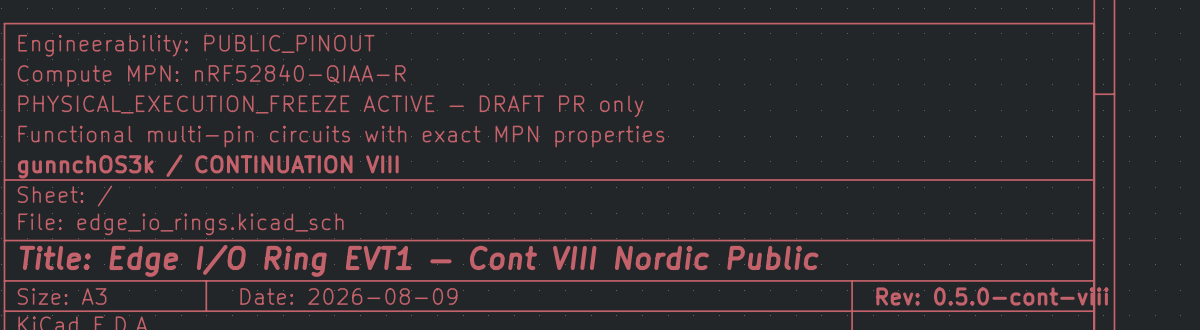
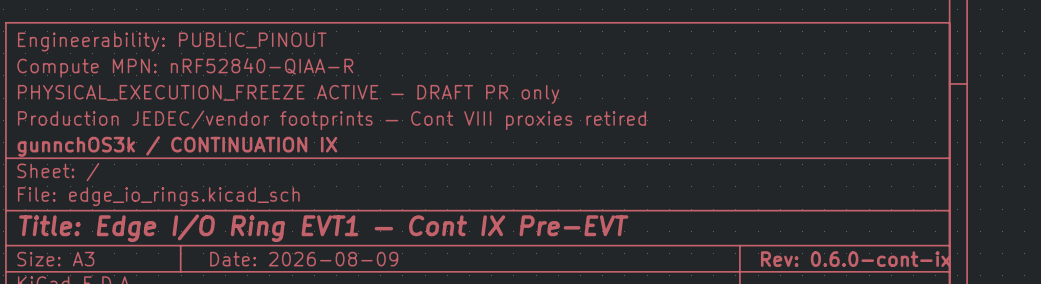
title block: Functional multi-pin circuits with exact MPN properties (341, 136) -> Production JEDEC/vendor footprints — Cont VIII proxies retired (331, 120)
title block: gunnchOS3k / CONTINUATION VIII (208, 166) -> gunnchOS3k / CONTINUATION IX (177, 146)
title block: Title: Edge I/O Ring EVT1 — Cont VIII Nordic Public (419, 260) -> Title: Edge I/O Ring EVT1 — Cont IX Pre-EVT (323, 228)
title block: Rev: 0.5.0-cont-viii (992, 296) -> Rev: 0.6.0-cont-ix (855, 259)

